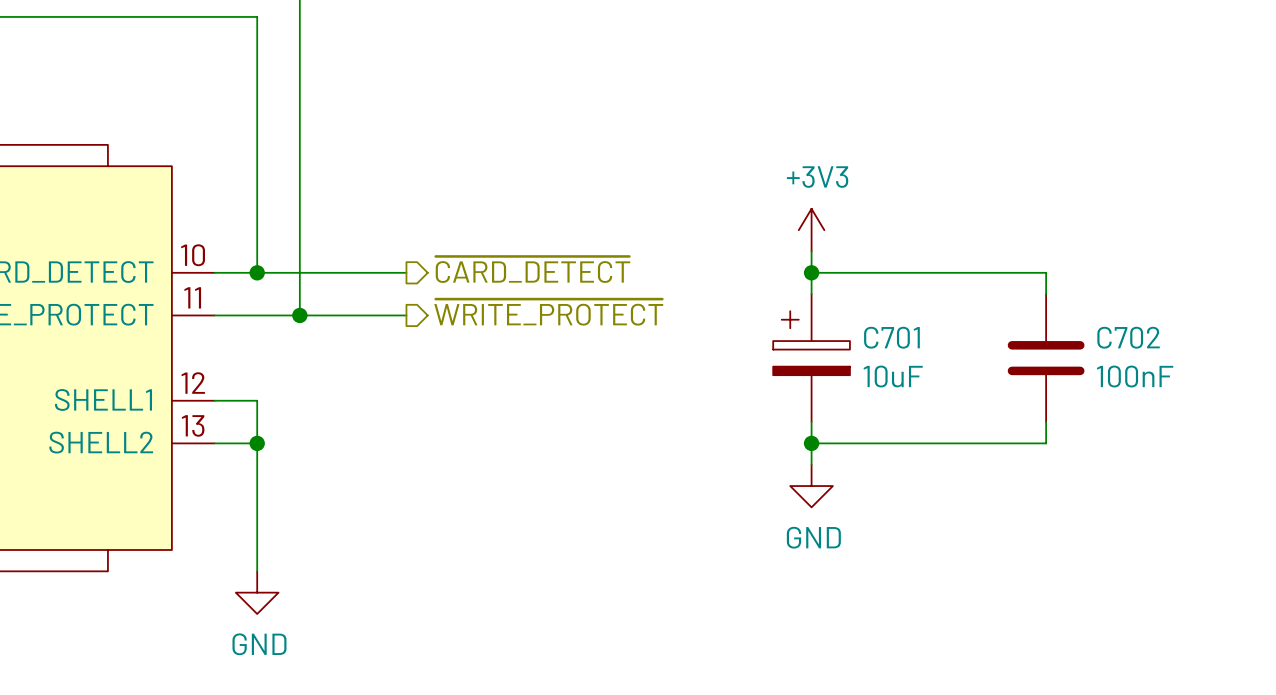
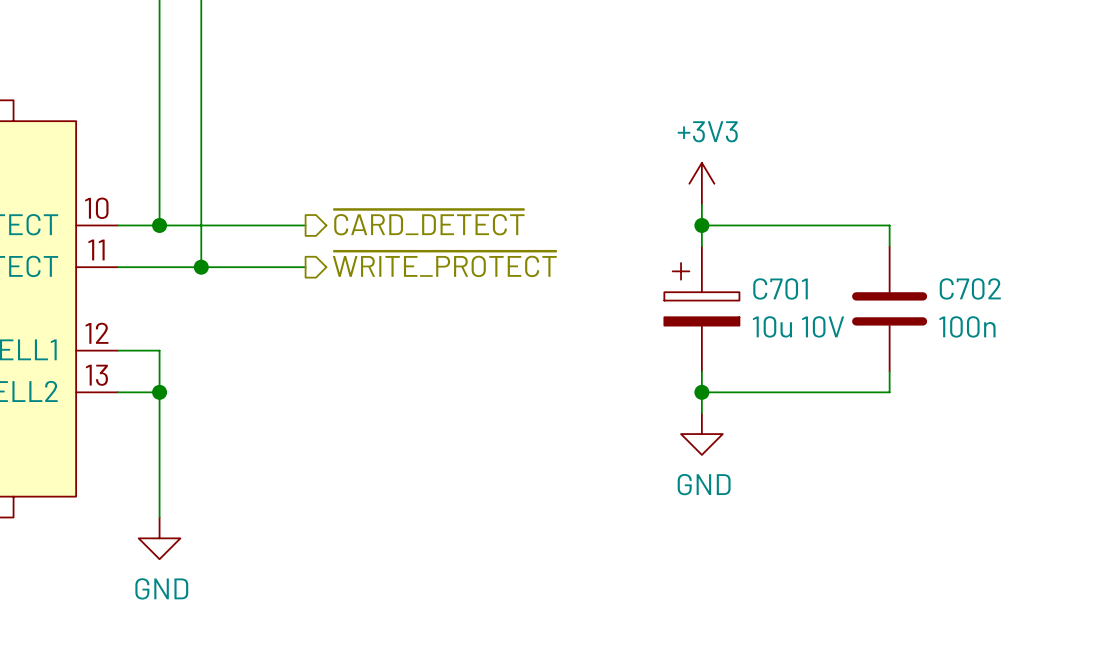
wire: (1003, 272) (1046, 272) (1046, 294) -> (889, 225) (889, 246)
C702 position: (1046, 358) -> (889, 308)
C701 value: 10uF (893, 376) -> 10u 10V (798, 326)
C702 value: 100nF (1135, 376) -> 100n (967, 326)
wire: (1046, 422) (1046, 443) (1003, 443) -> (889, 371) (889, 392)

